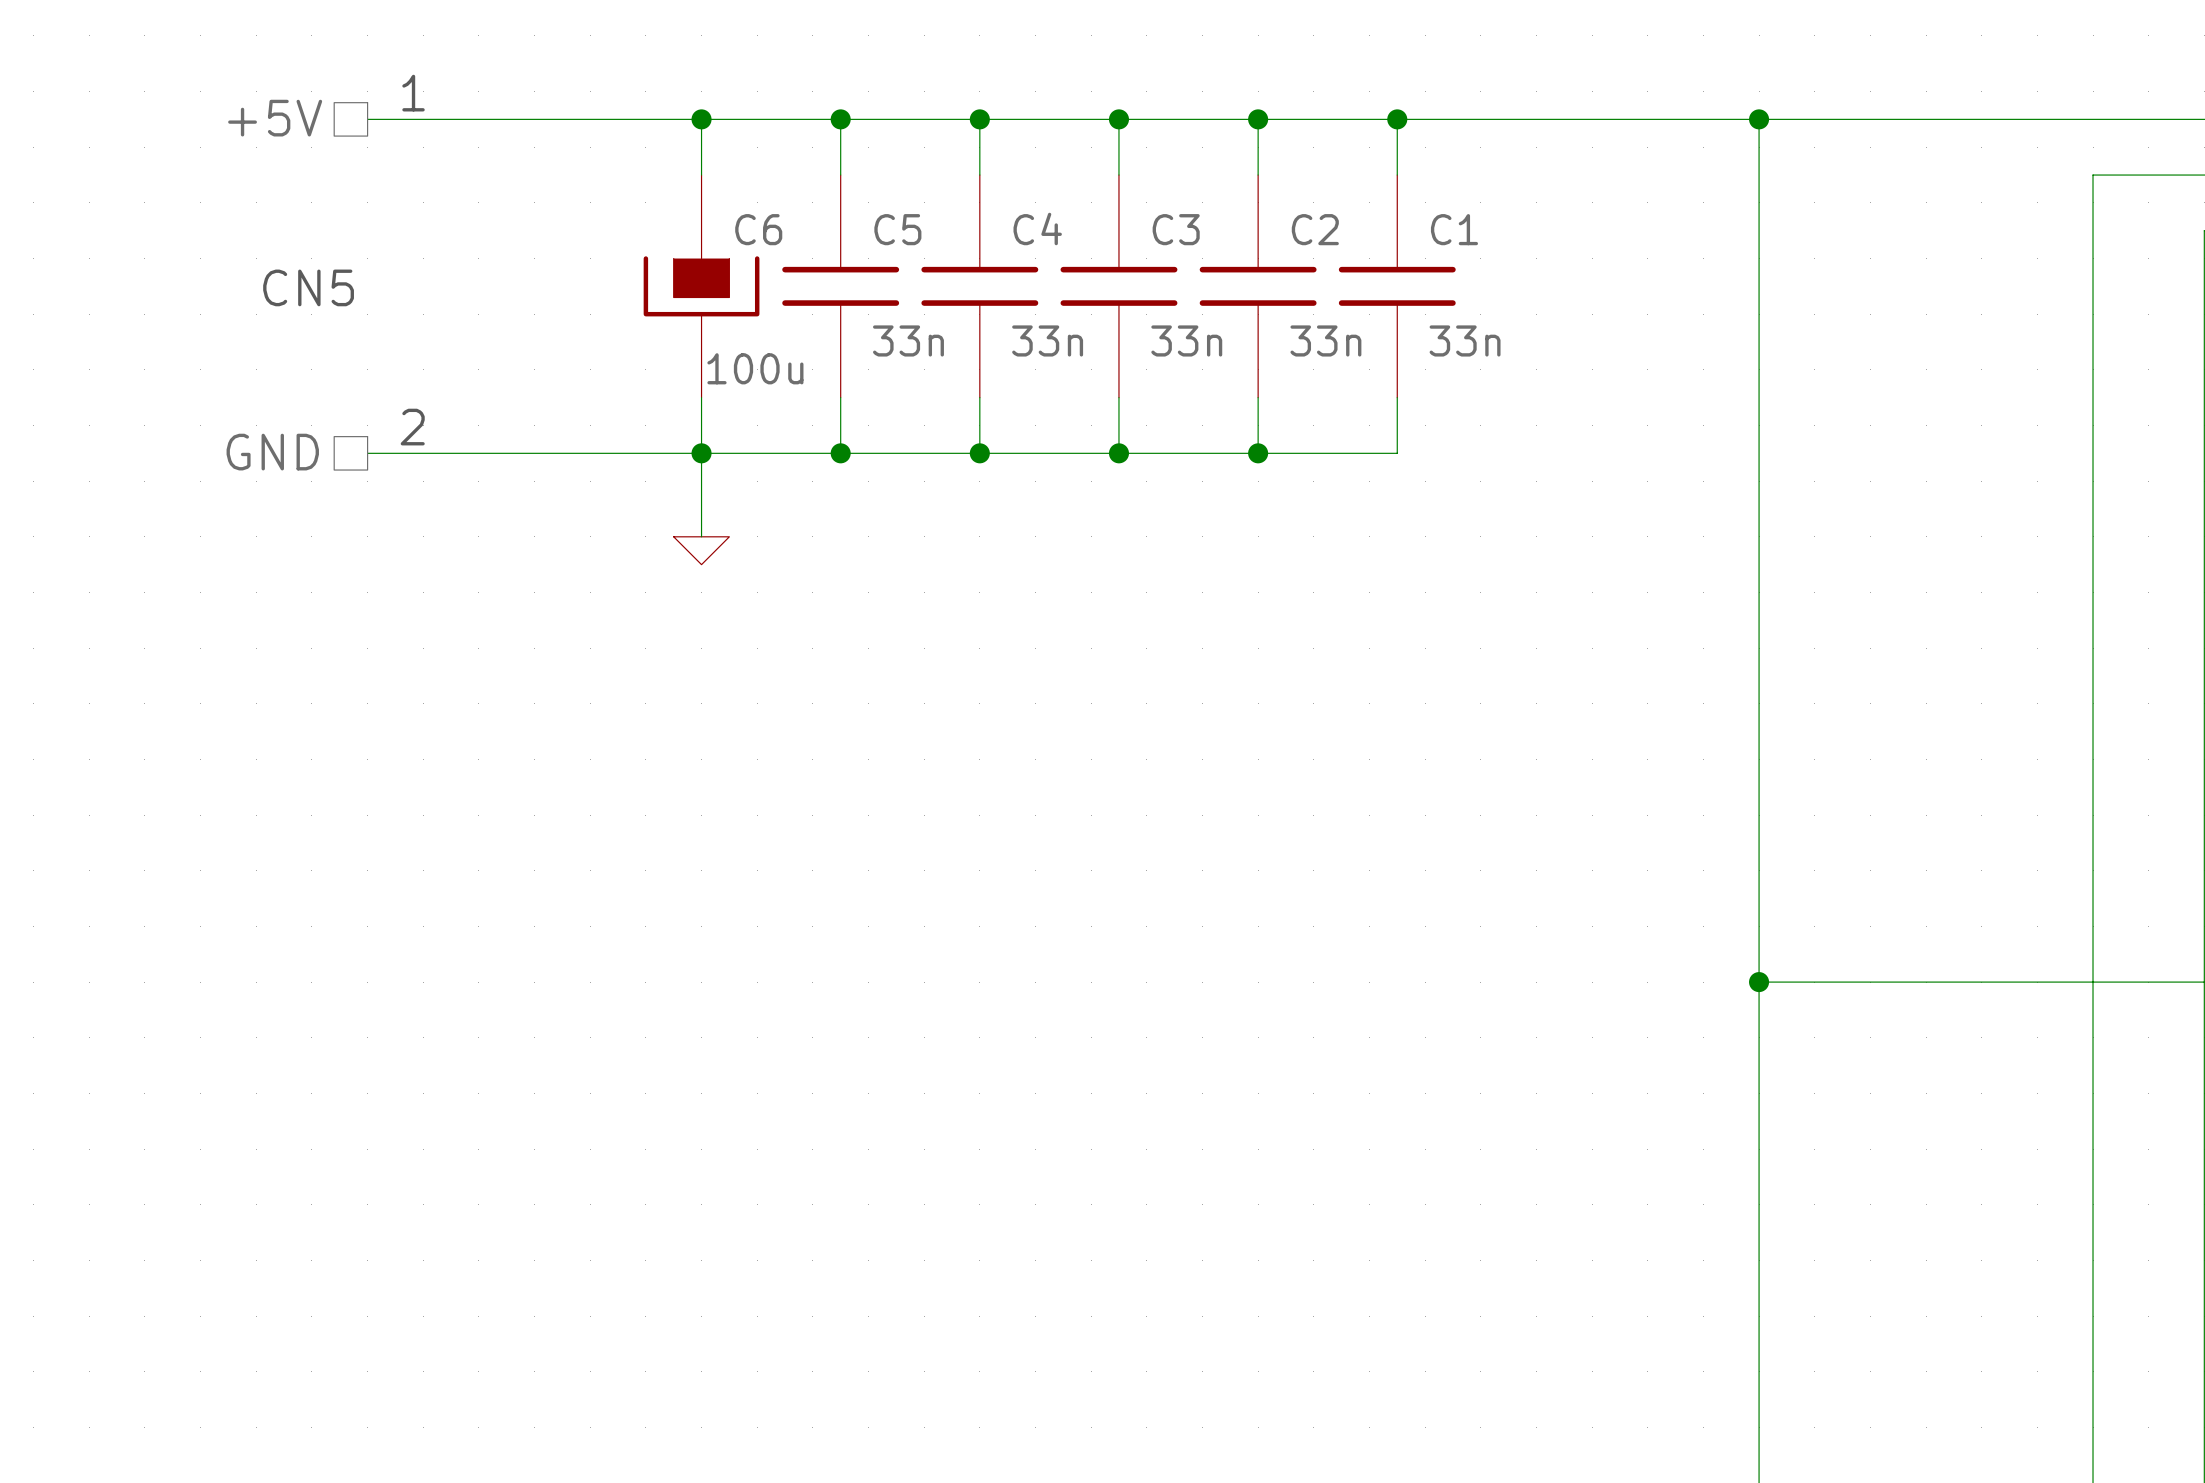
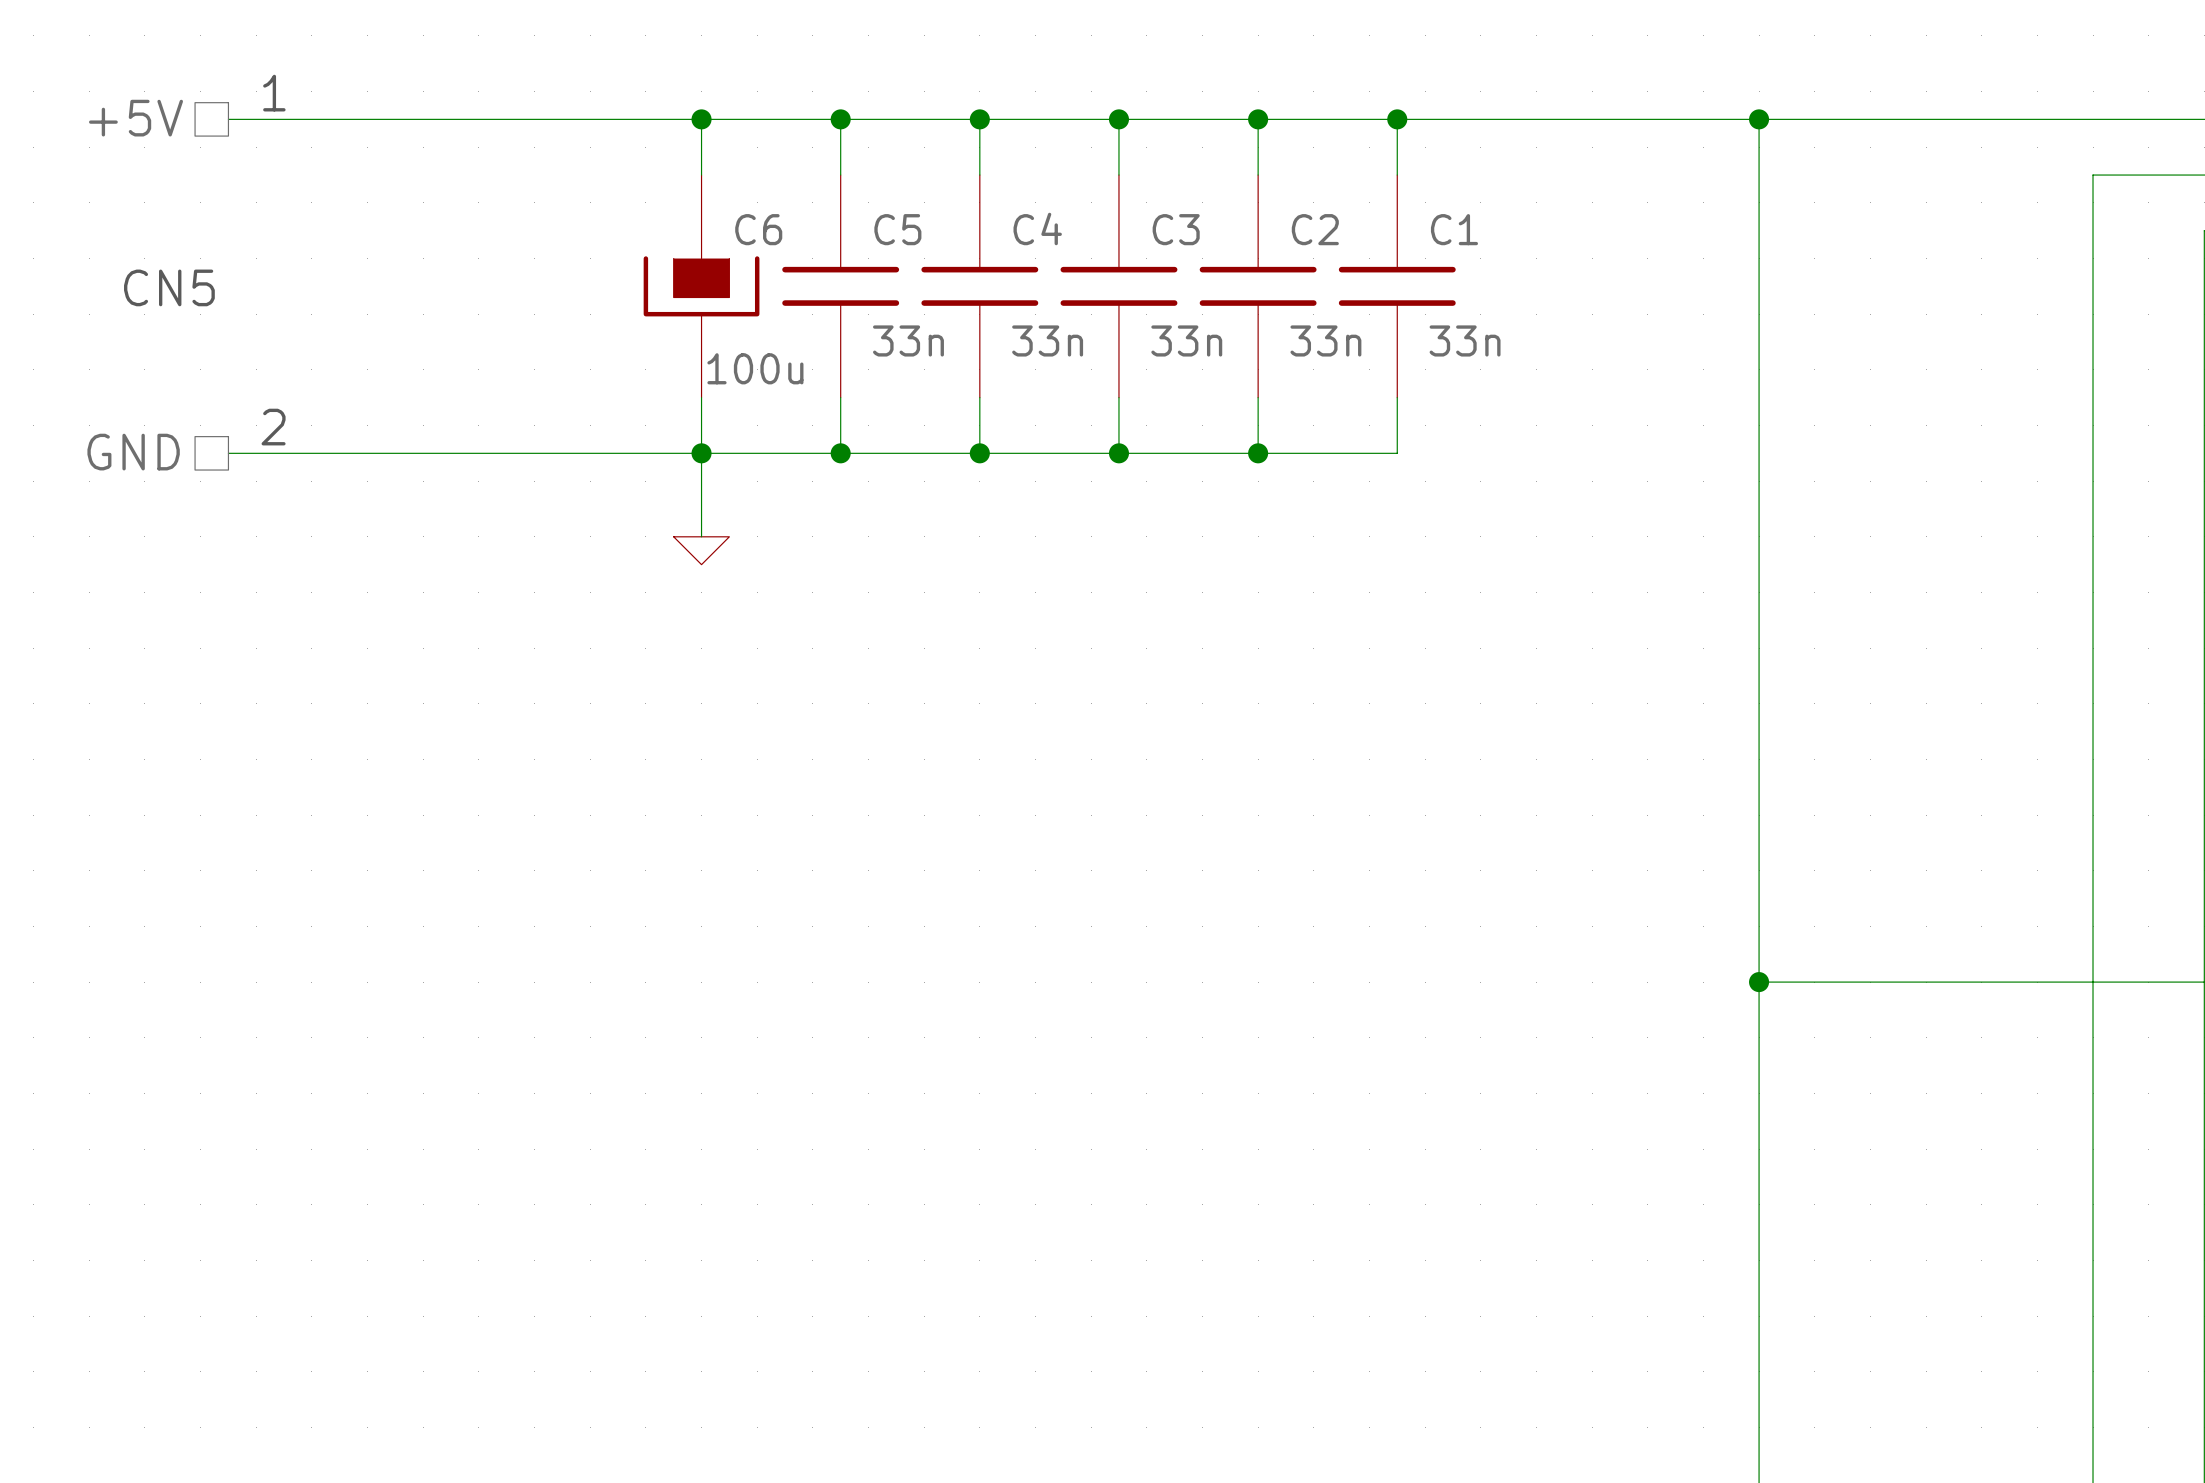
text position: 1 (413, 93) -> 1 (274, 93)
hierarchical label position: +5V (275, 118) -> +5V (136, 118)
wire: none -> (228, 119) (367, 119)
text position: CN5 (308, 287) -> CN5 (169, 287)
text position: 2 (412, 427) -> 2 (273, 427)
hierarchical label position: GND (272, 452) -> GND (133, 452)
wire: none -> (228, 453) (367, 453)

